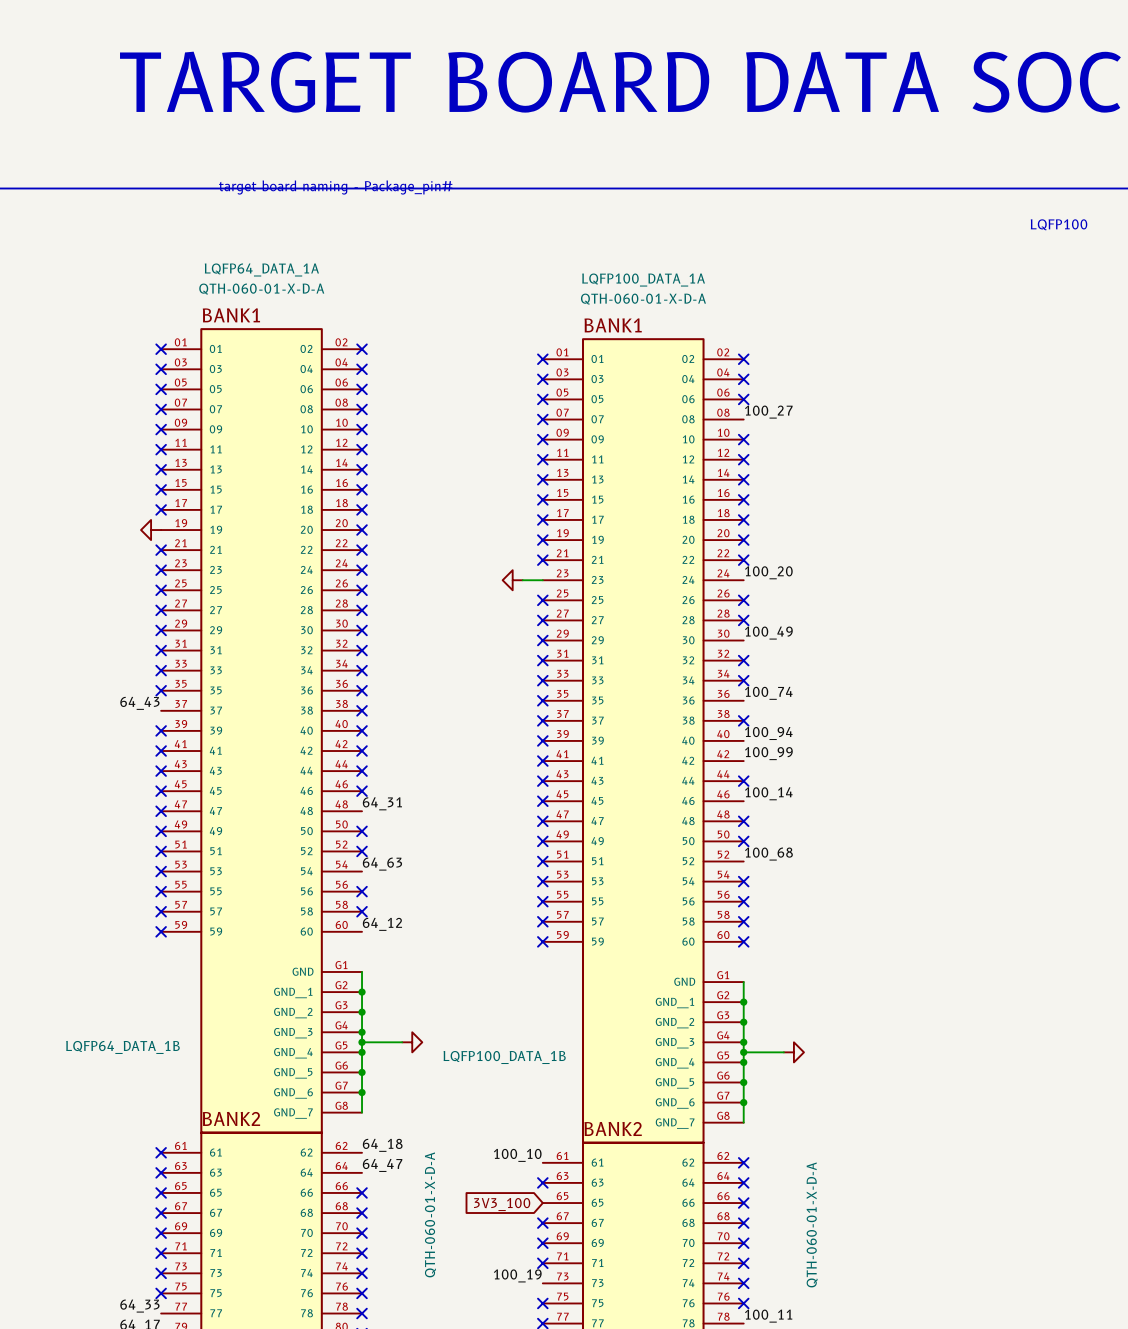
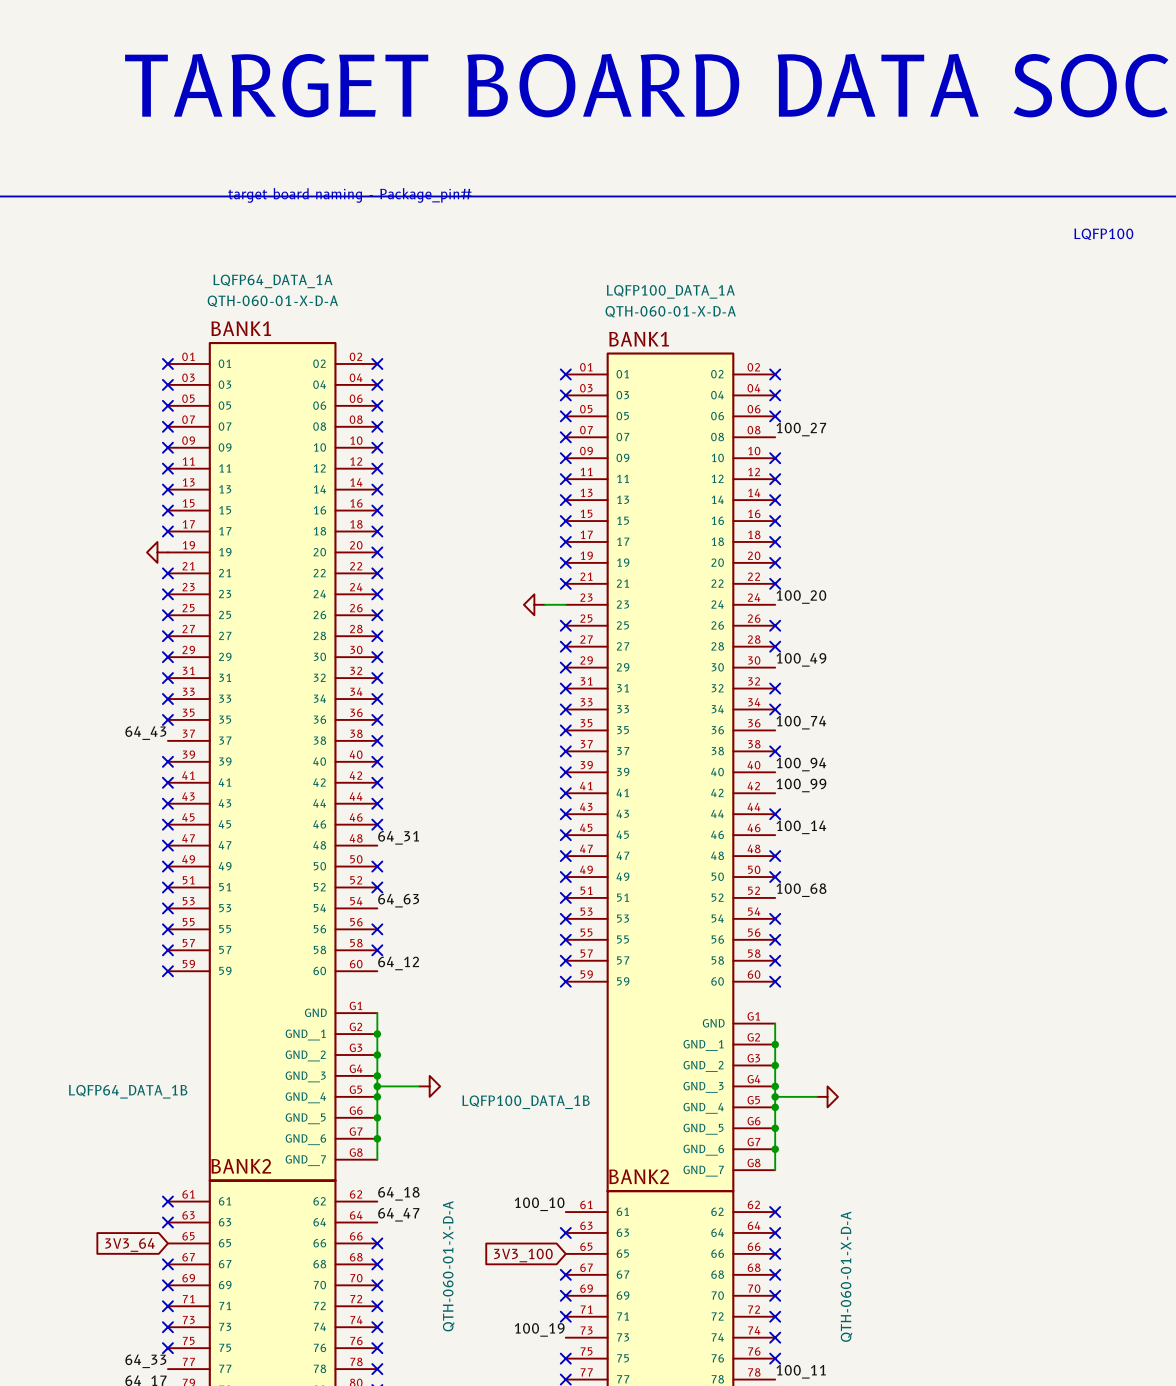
no-connect mark: (161, 1192) -> none
global label: none -> 3V3_64 (129, 1245)

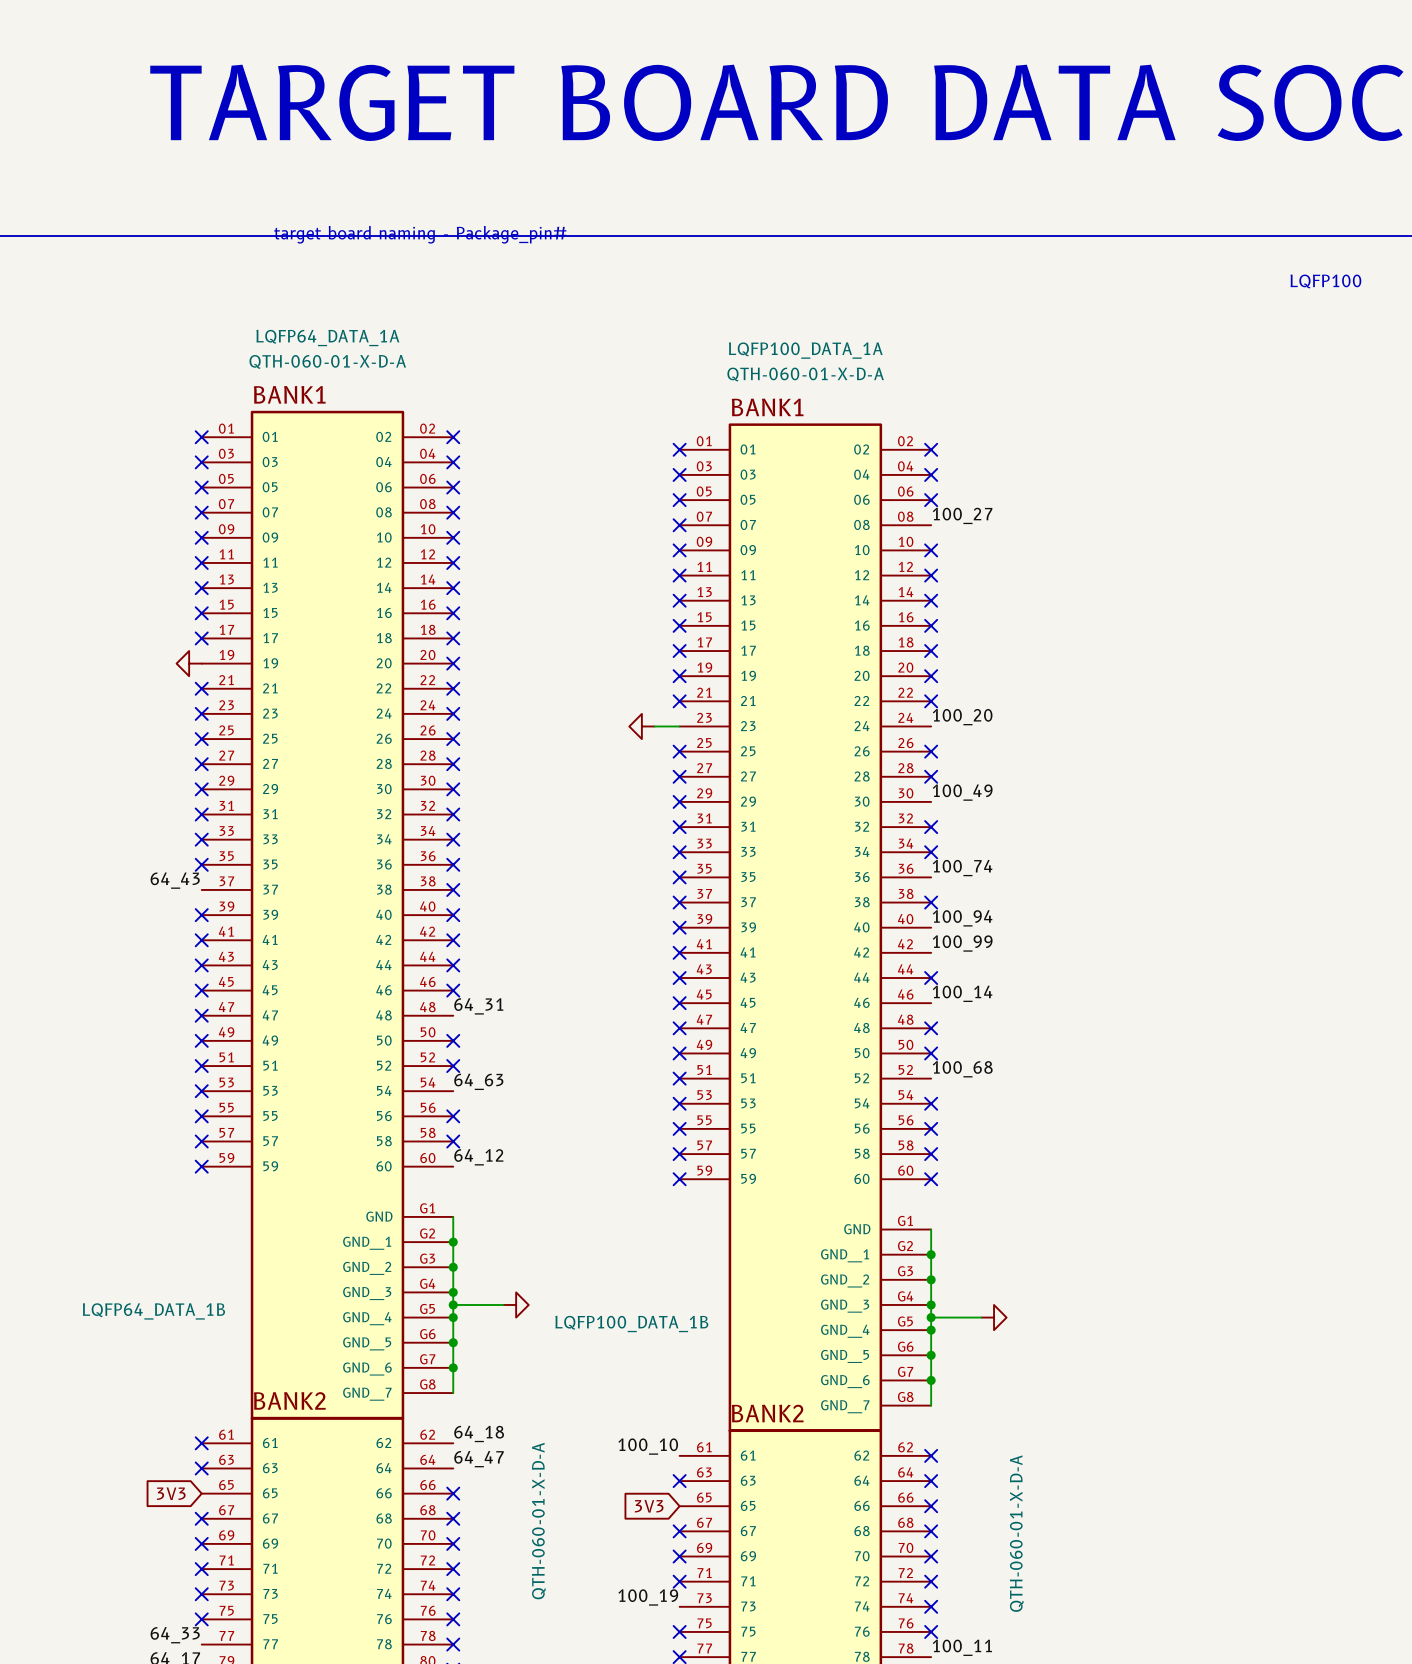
global label: 3V3_64 (129, 1245) -> 3V3 (171, 1493)
global label: 3V3_100 (523, 1255) -> 3V3 (649, 1506)

